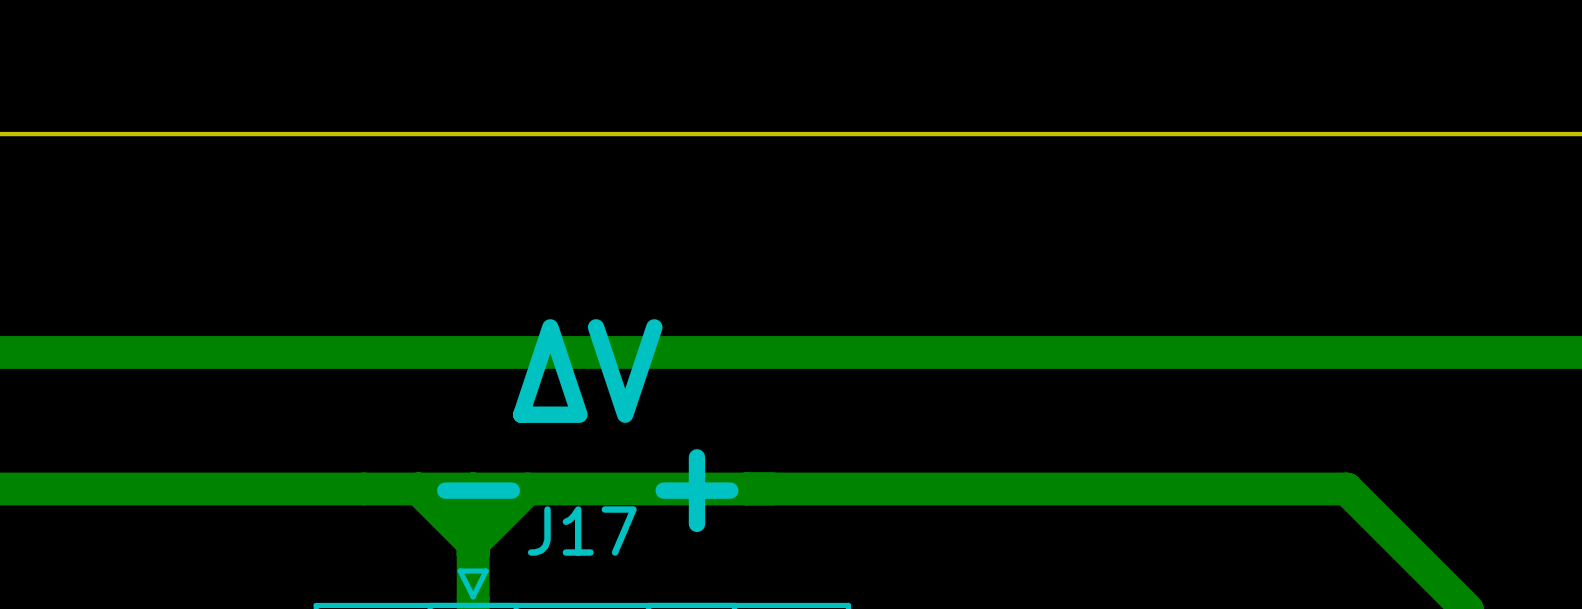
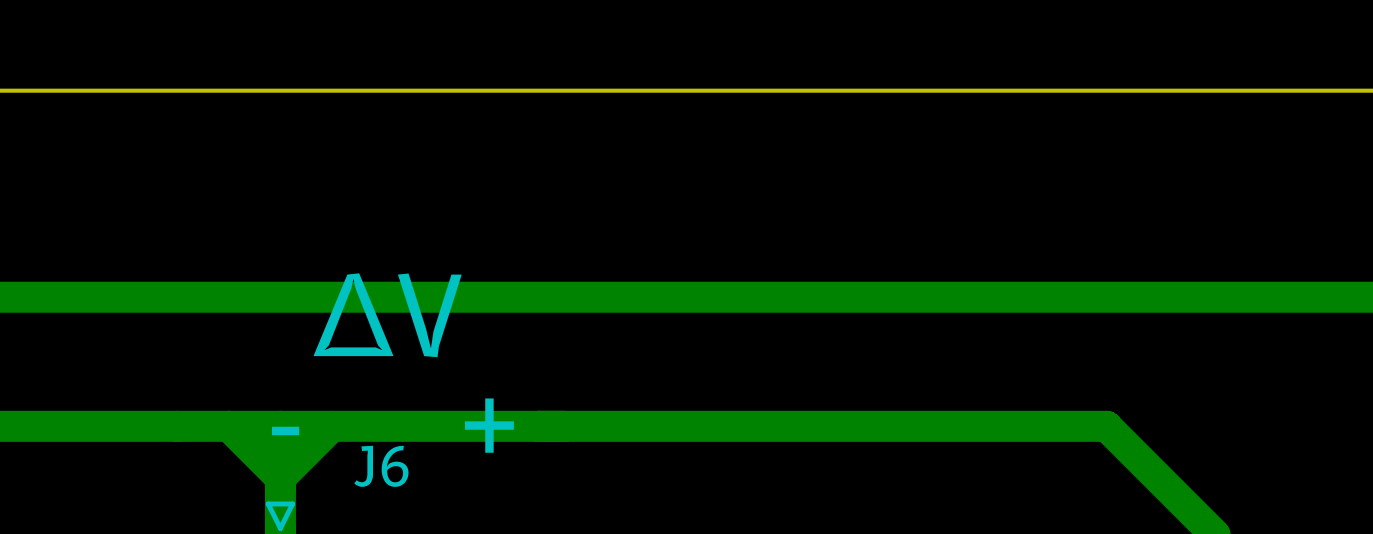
J17 name: J17 (582, 531) -> J6 (381, 466)

